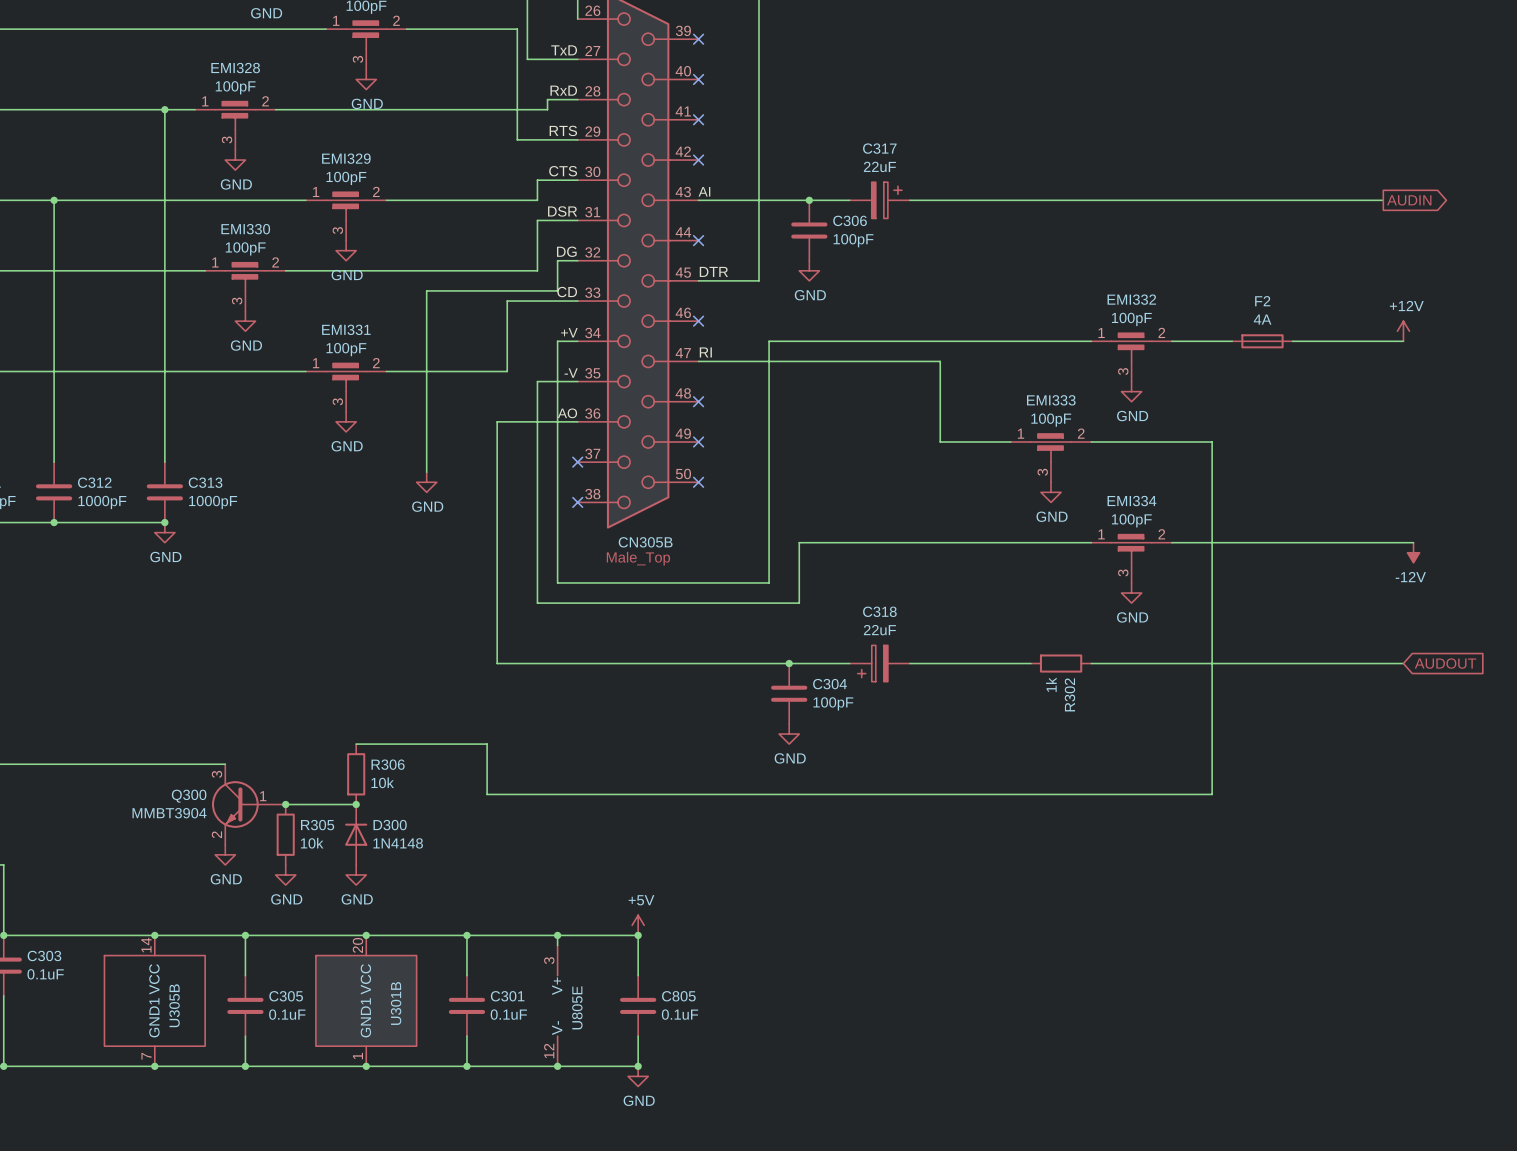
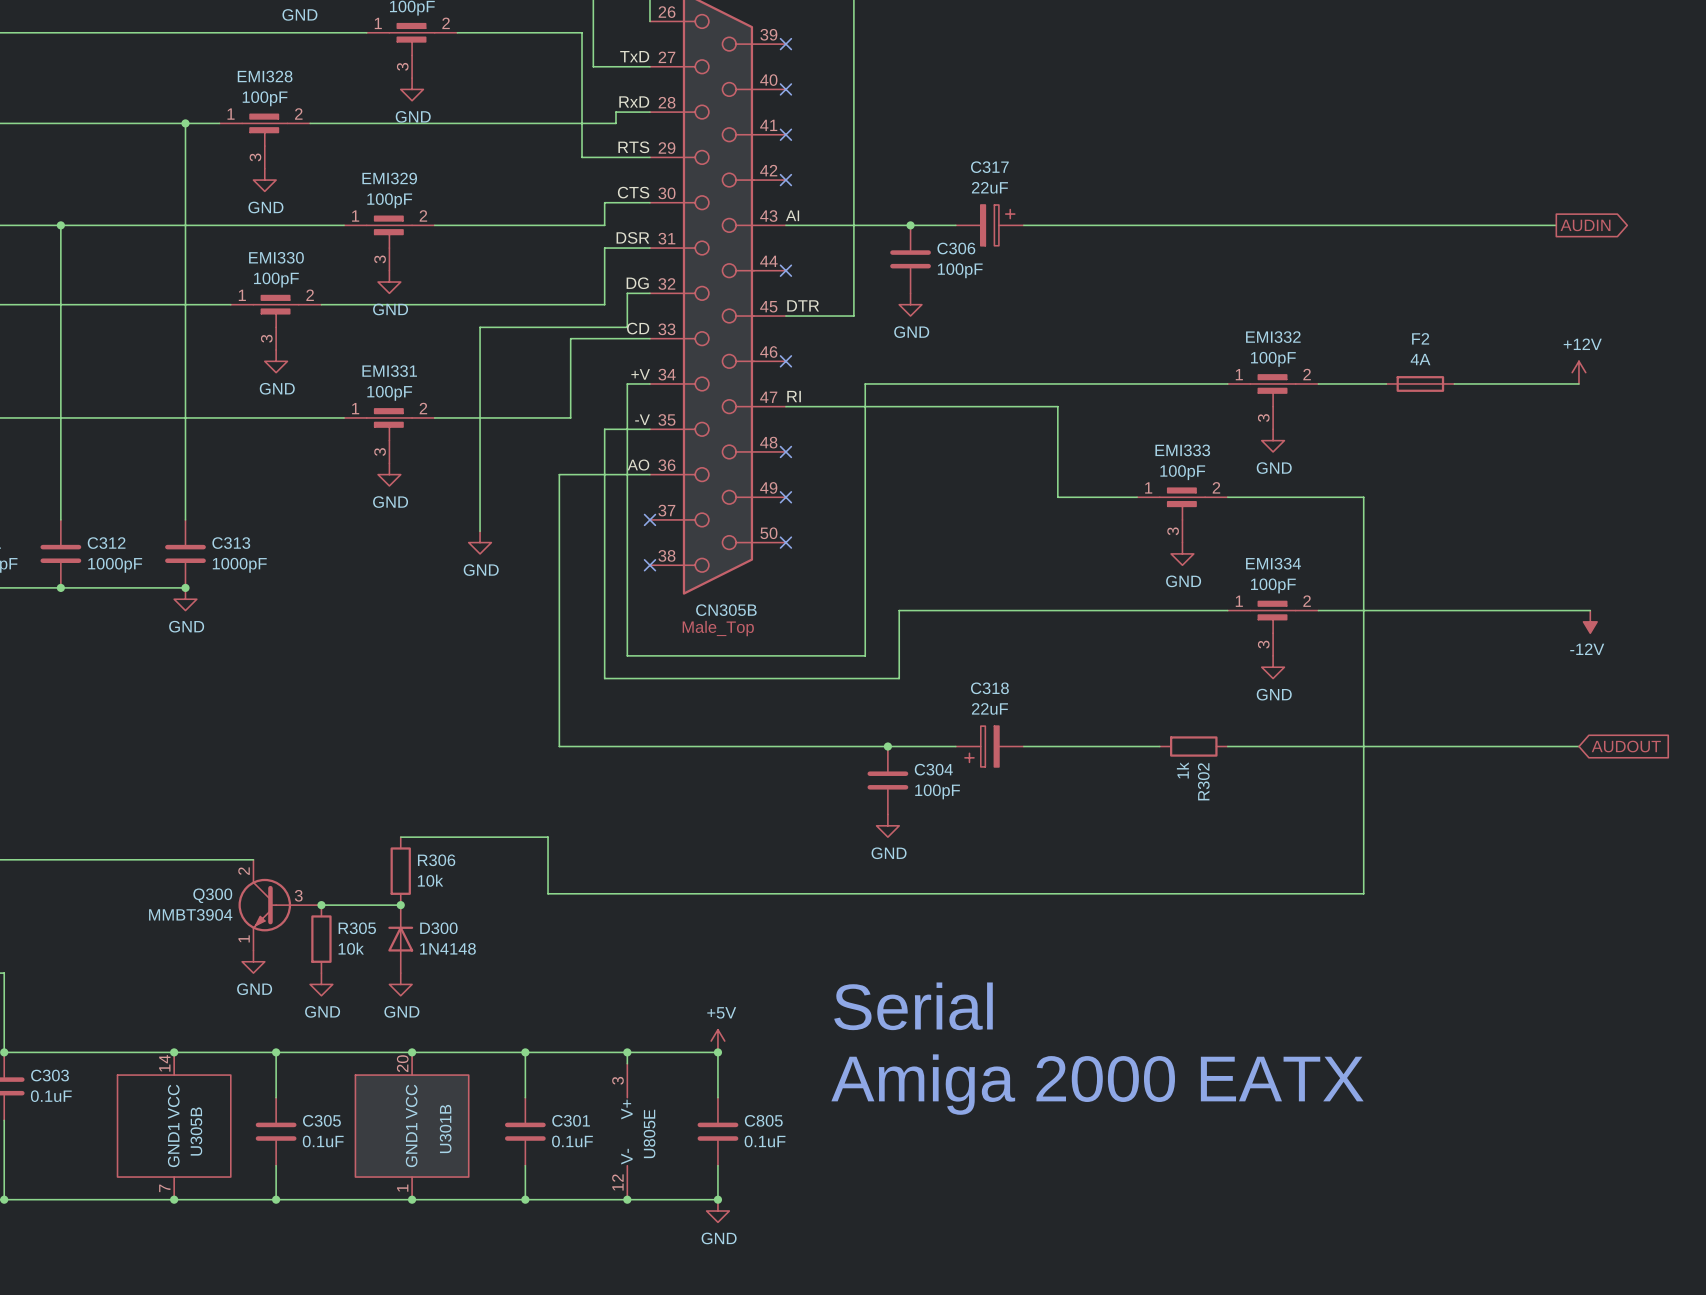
Q300 symbol: [211, 764, 286, 845] -> [238, 859, 322, 951]
text: none -> Serial (913, 1006)
text: none -> Amiga 2000 EATX (1097, 1084)

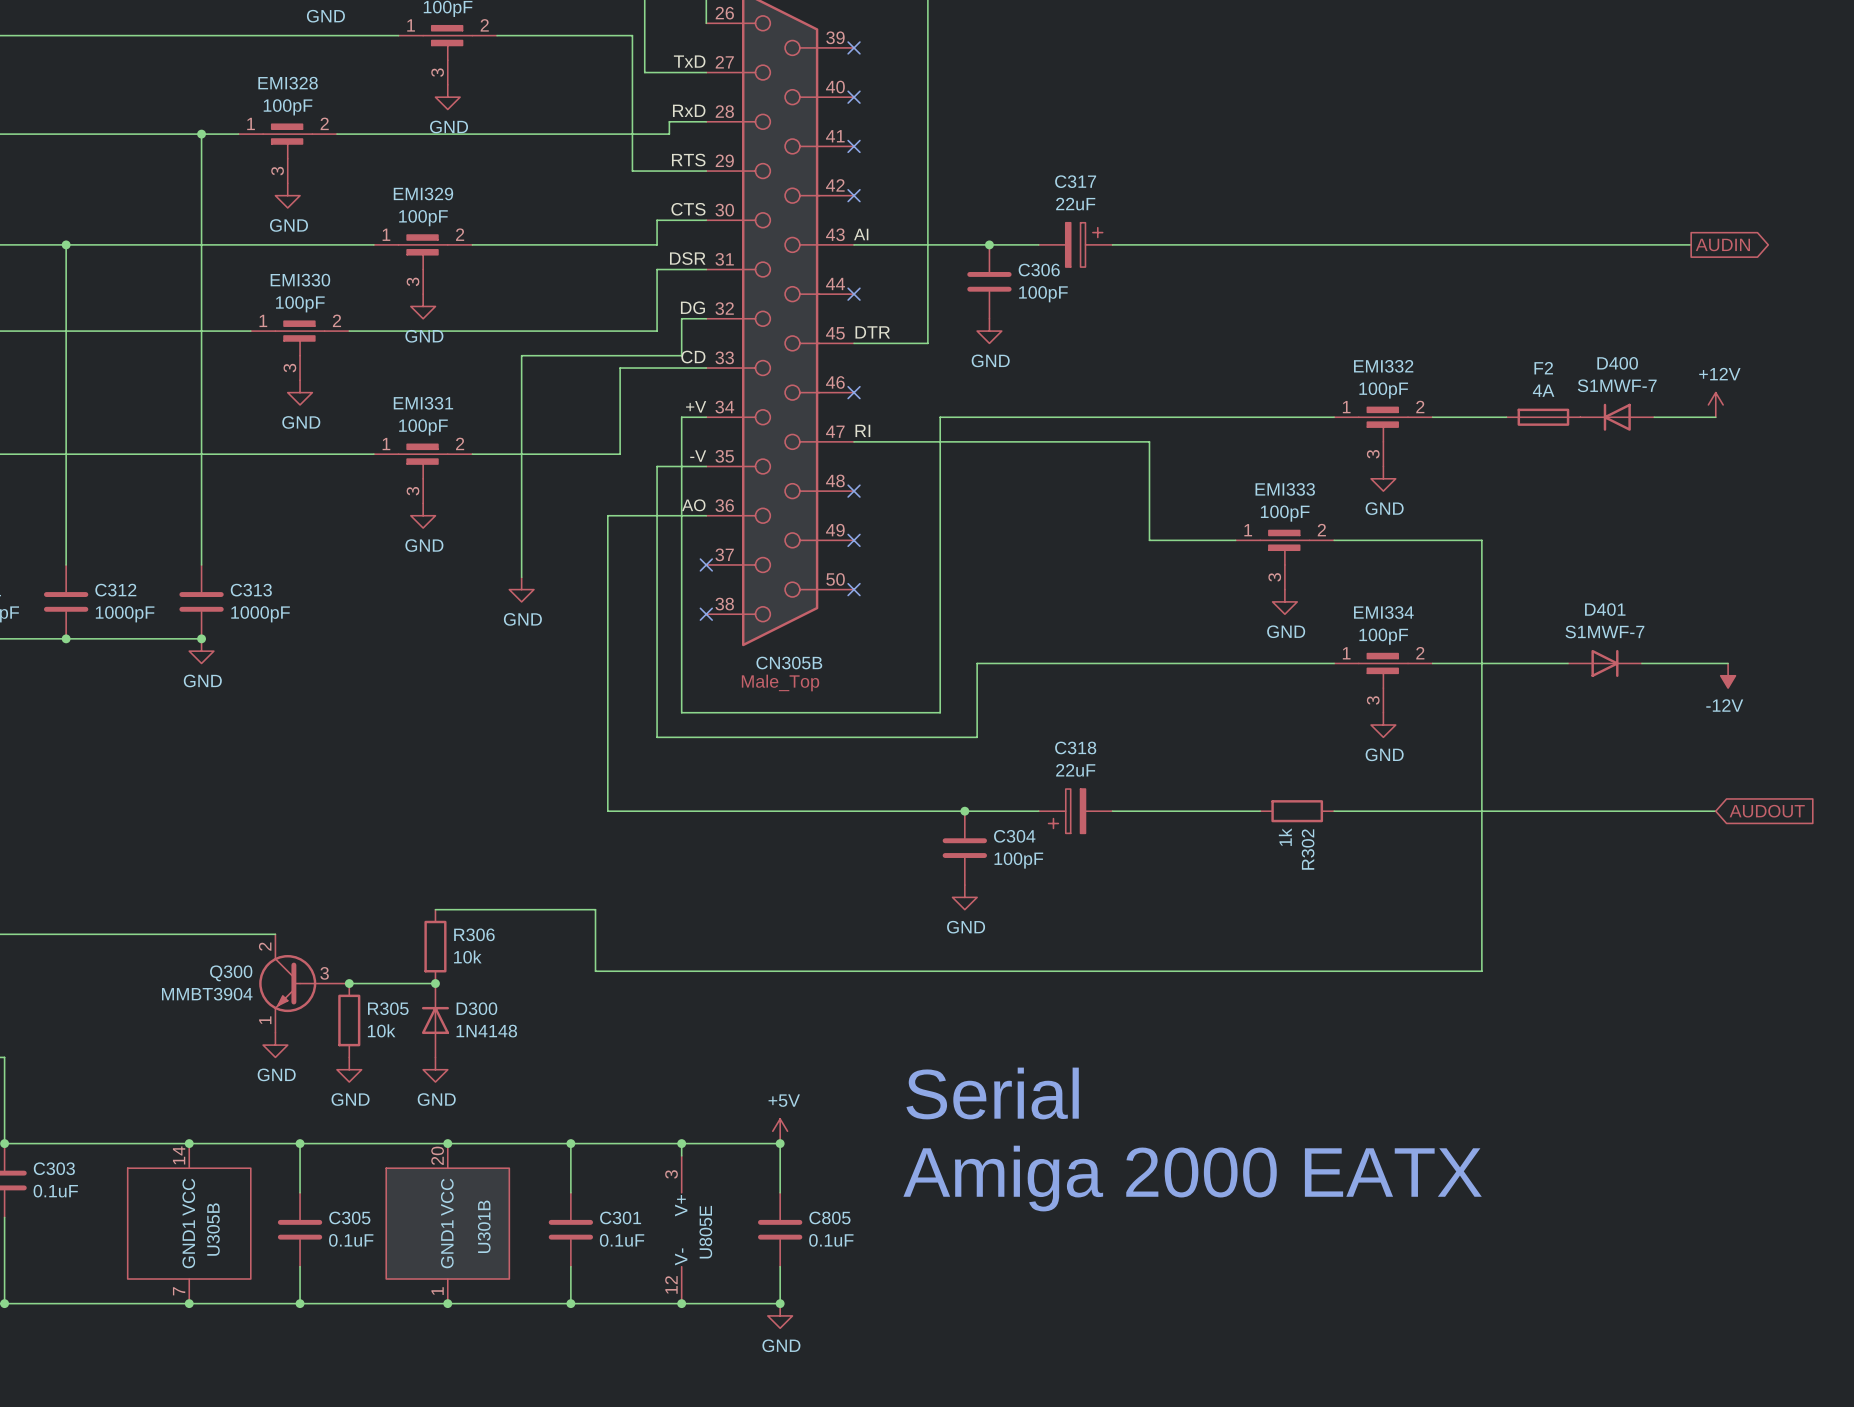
D400: none -> S1MWF-7 (1617, 417)
D401: none -> S1MWF-7 (1604, 663)

